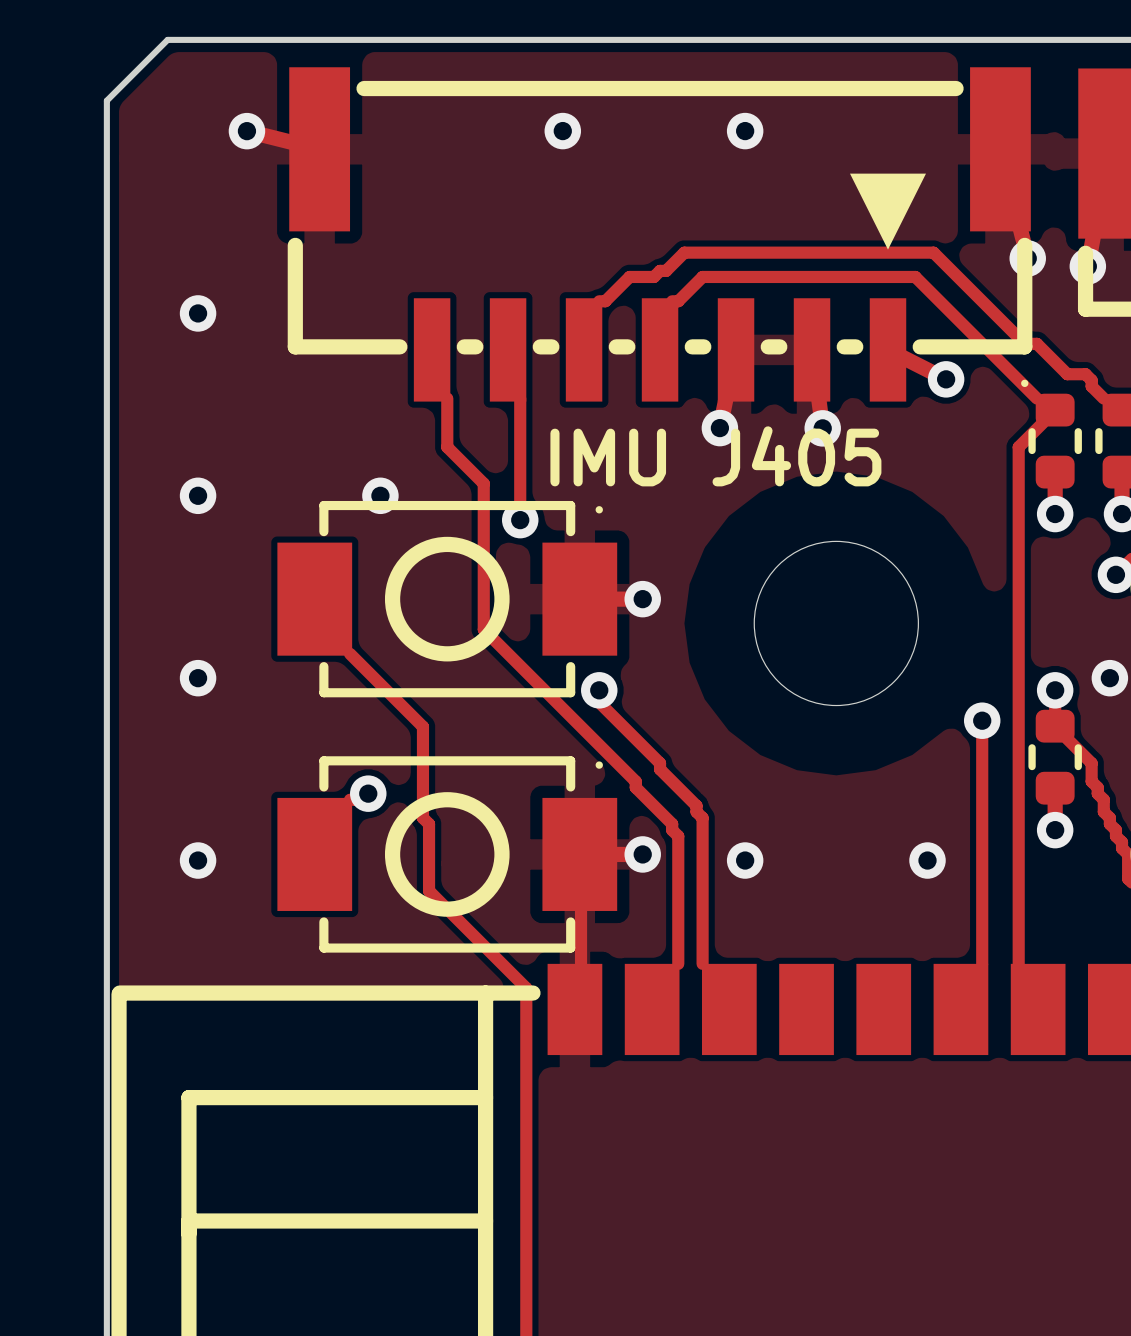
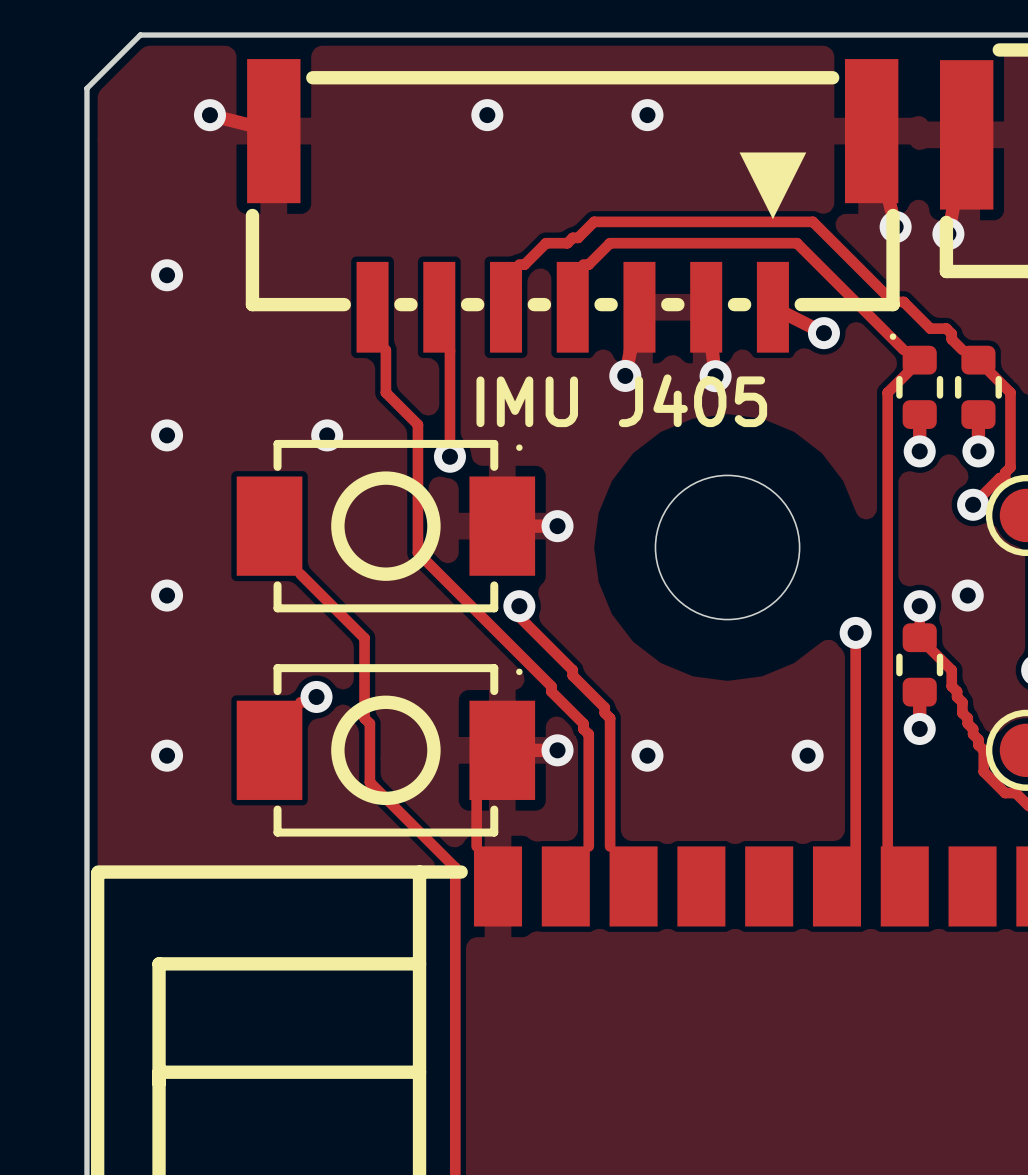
track: (581, 854) (581, 963) -> none
track: none -> (476, 798) (476, 846)

